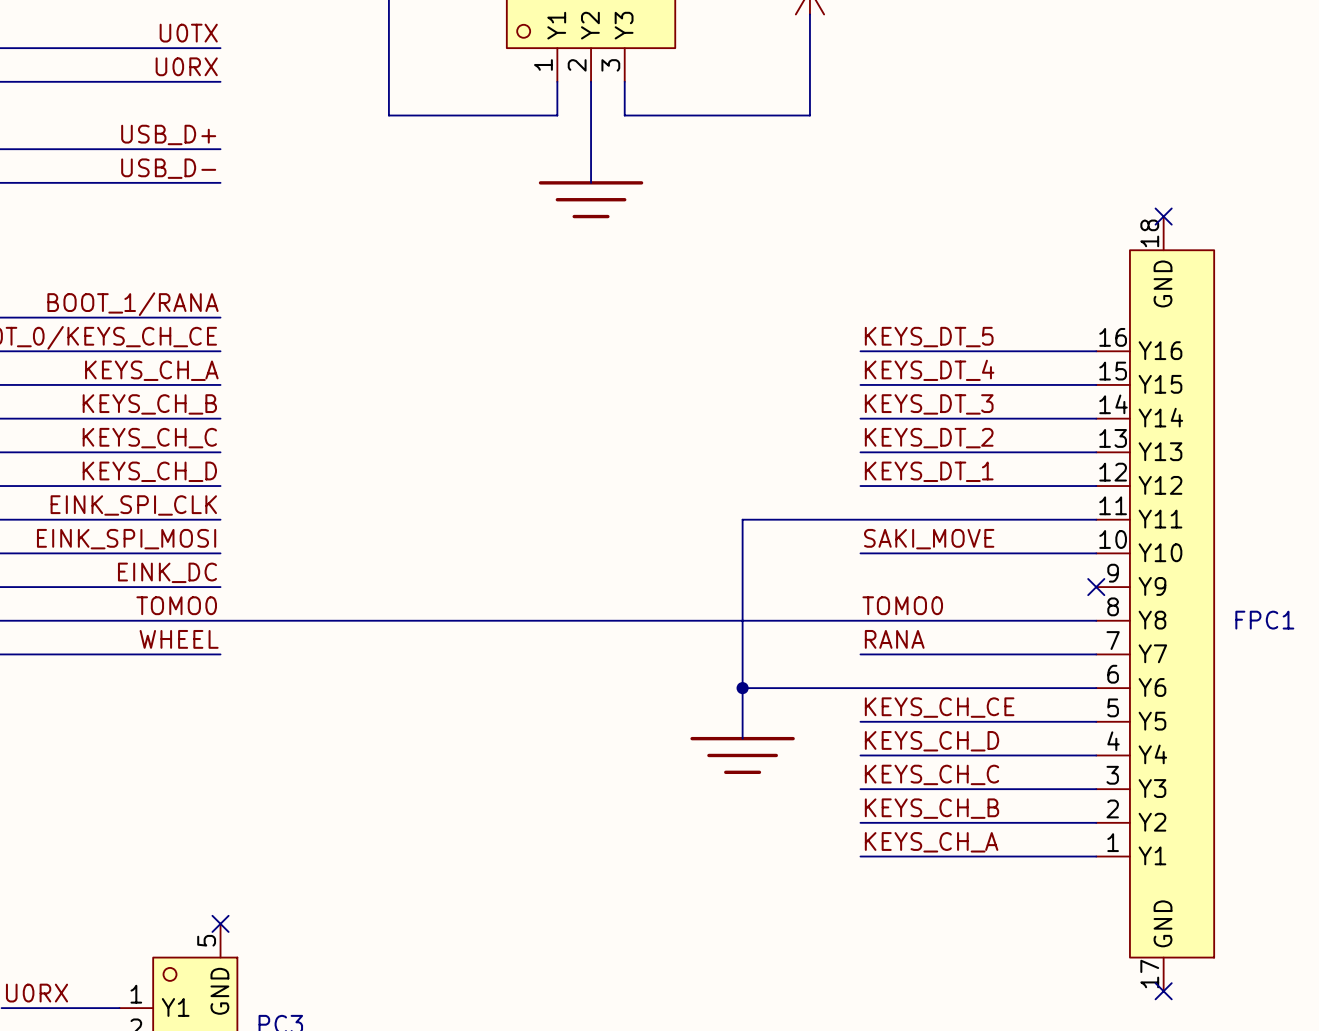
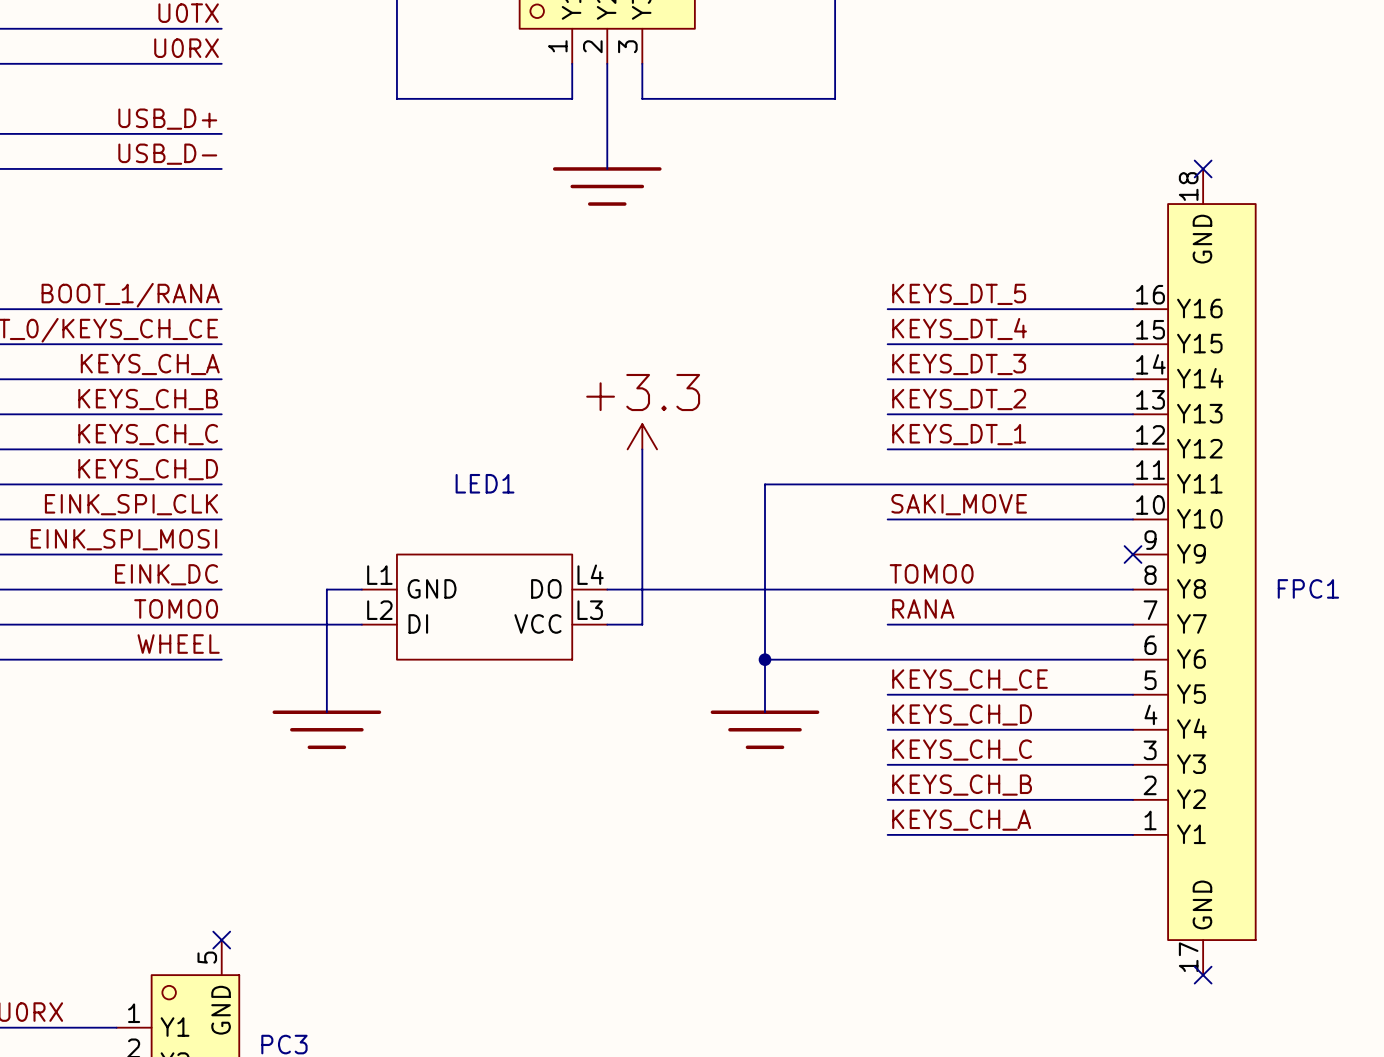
no-connect mark position: (1163, 216) -> (1203, 168)
label: none -> KEYS_DT_5 (959, 294)
label: KEYS_DT_5 (929, 337) -> KEYS_DT_4 (959, 329)
label: KEYS_DT_4 (929, 370) -> KEYS_DT_3 (959, 364)
label: KEYS_DT_3 (929, 404) -> KEYS_DT_2 (959, 399)
label: KEYS_DT_2 (929, 438) -> KEYS_DT_1 (959, 434)
power symbol: none -> (642, 436)
label: KEYS_DT_1 (929, 471) -> none
wire: (742, 519) (860, 519) -> (764, 519) (764, 484) (887, 484)
label position: SAKI_MOVE (929, 539) -> SAKI_MOVE (959, 504)
wire: (860, 553) (1096, 553) -> (887, 309) (1133, 309)
label: none -> TOMO0 (931, 573)
wire: none -> (361, 589) (326, 589) (326, 712)
wire: none -> (607, 589) (1133, 589)
no-connect mark position: (1096, 587) -> (1133, 554)
LED1: none -> (484, 607)
FPC1 position: (1155, 603) -> (1194, 572)
label: TOMO0 (902, 605) -> RANA (923, 608)
wire: (355, 620) (591, 620) -> none
wire: (624, 620) (860, 620) -> (642, 624) (642, 449)
label: RANA (894, 639) -> none
label: none -> KEYS_CH_CE (970, 679)
wire: (742, 688) (860, 688) -> (764, 659) (887, 659)
junction position: (742, 688) -> (764, 659)
wire: (742, 704) (742, 738) -> none
label: KEYS_CH_CE (939, 707) -> KEYS_CH_D (962, 714)
power symbol: none -> (326, 729)
label: KEYS_CH_D (932, 741) -> KEYS_CH_C (962, 750)
power symbol position: (742, 755) -> (764, 729)
label: KEYS_CH_C (932, 774) -> KEYS_CH_B (962, 785)
label: KEYS_CH_B (932, 808) -> KEYS_CH_A (961, 820)
label: KEYS_CH_A (931, 842) -> none
wire: (860, 856) (1096, 856) -> none
no-connect mark position: (1163, 991) -> (1203, 975)

